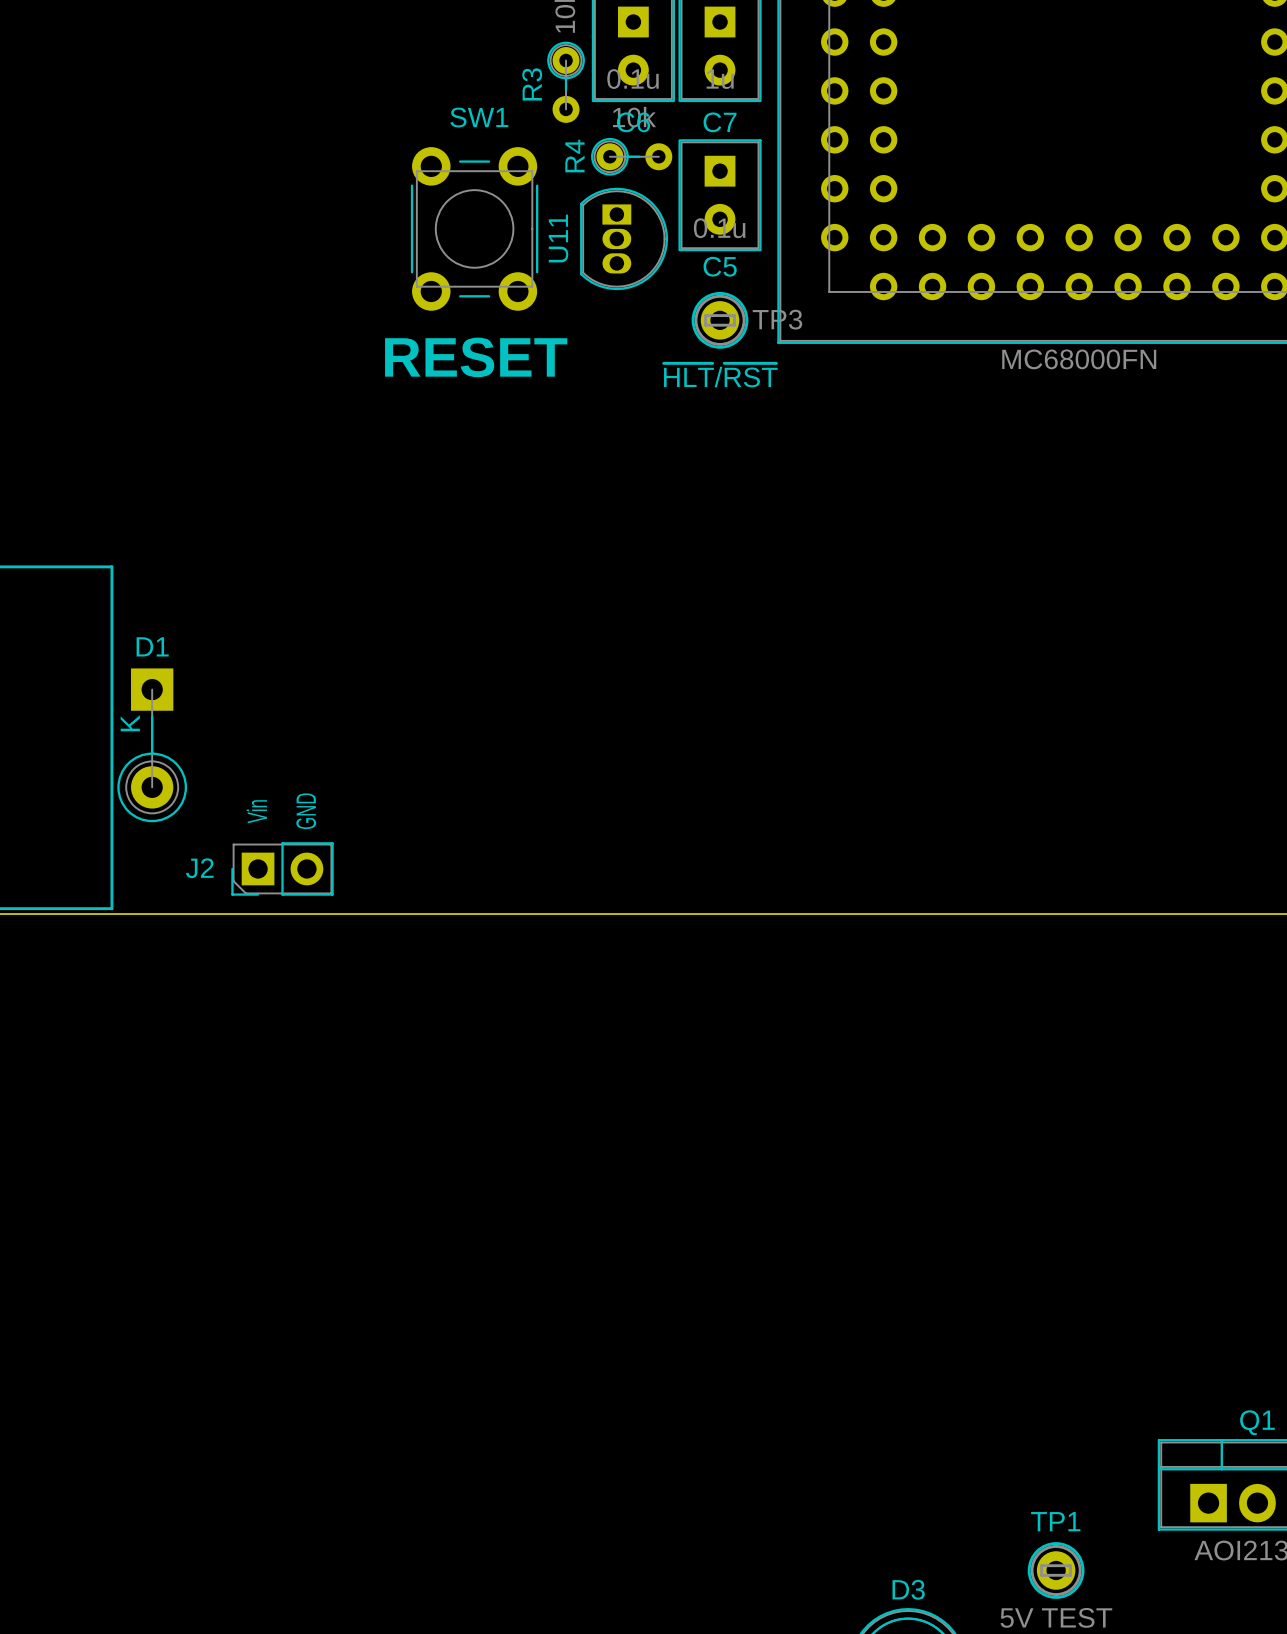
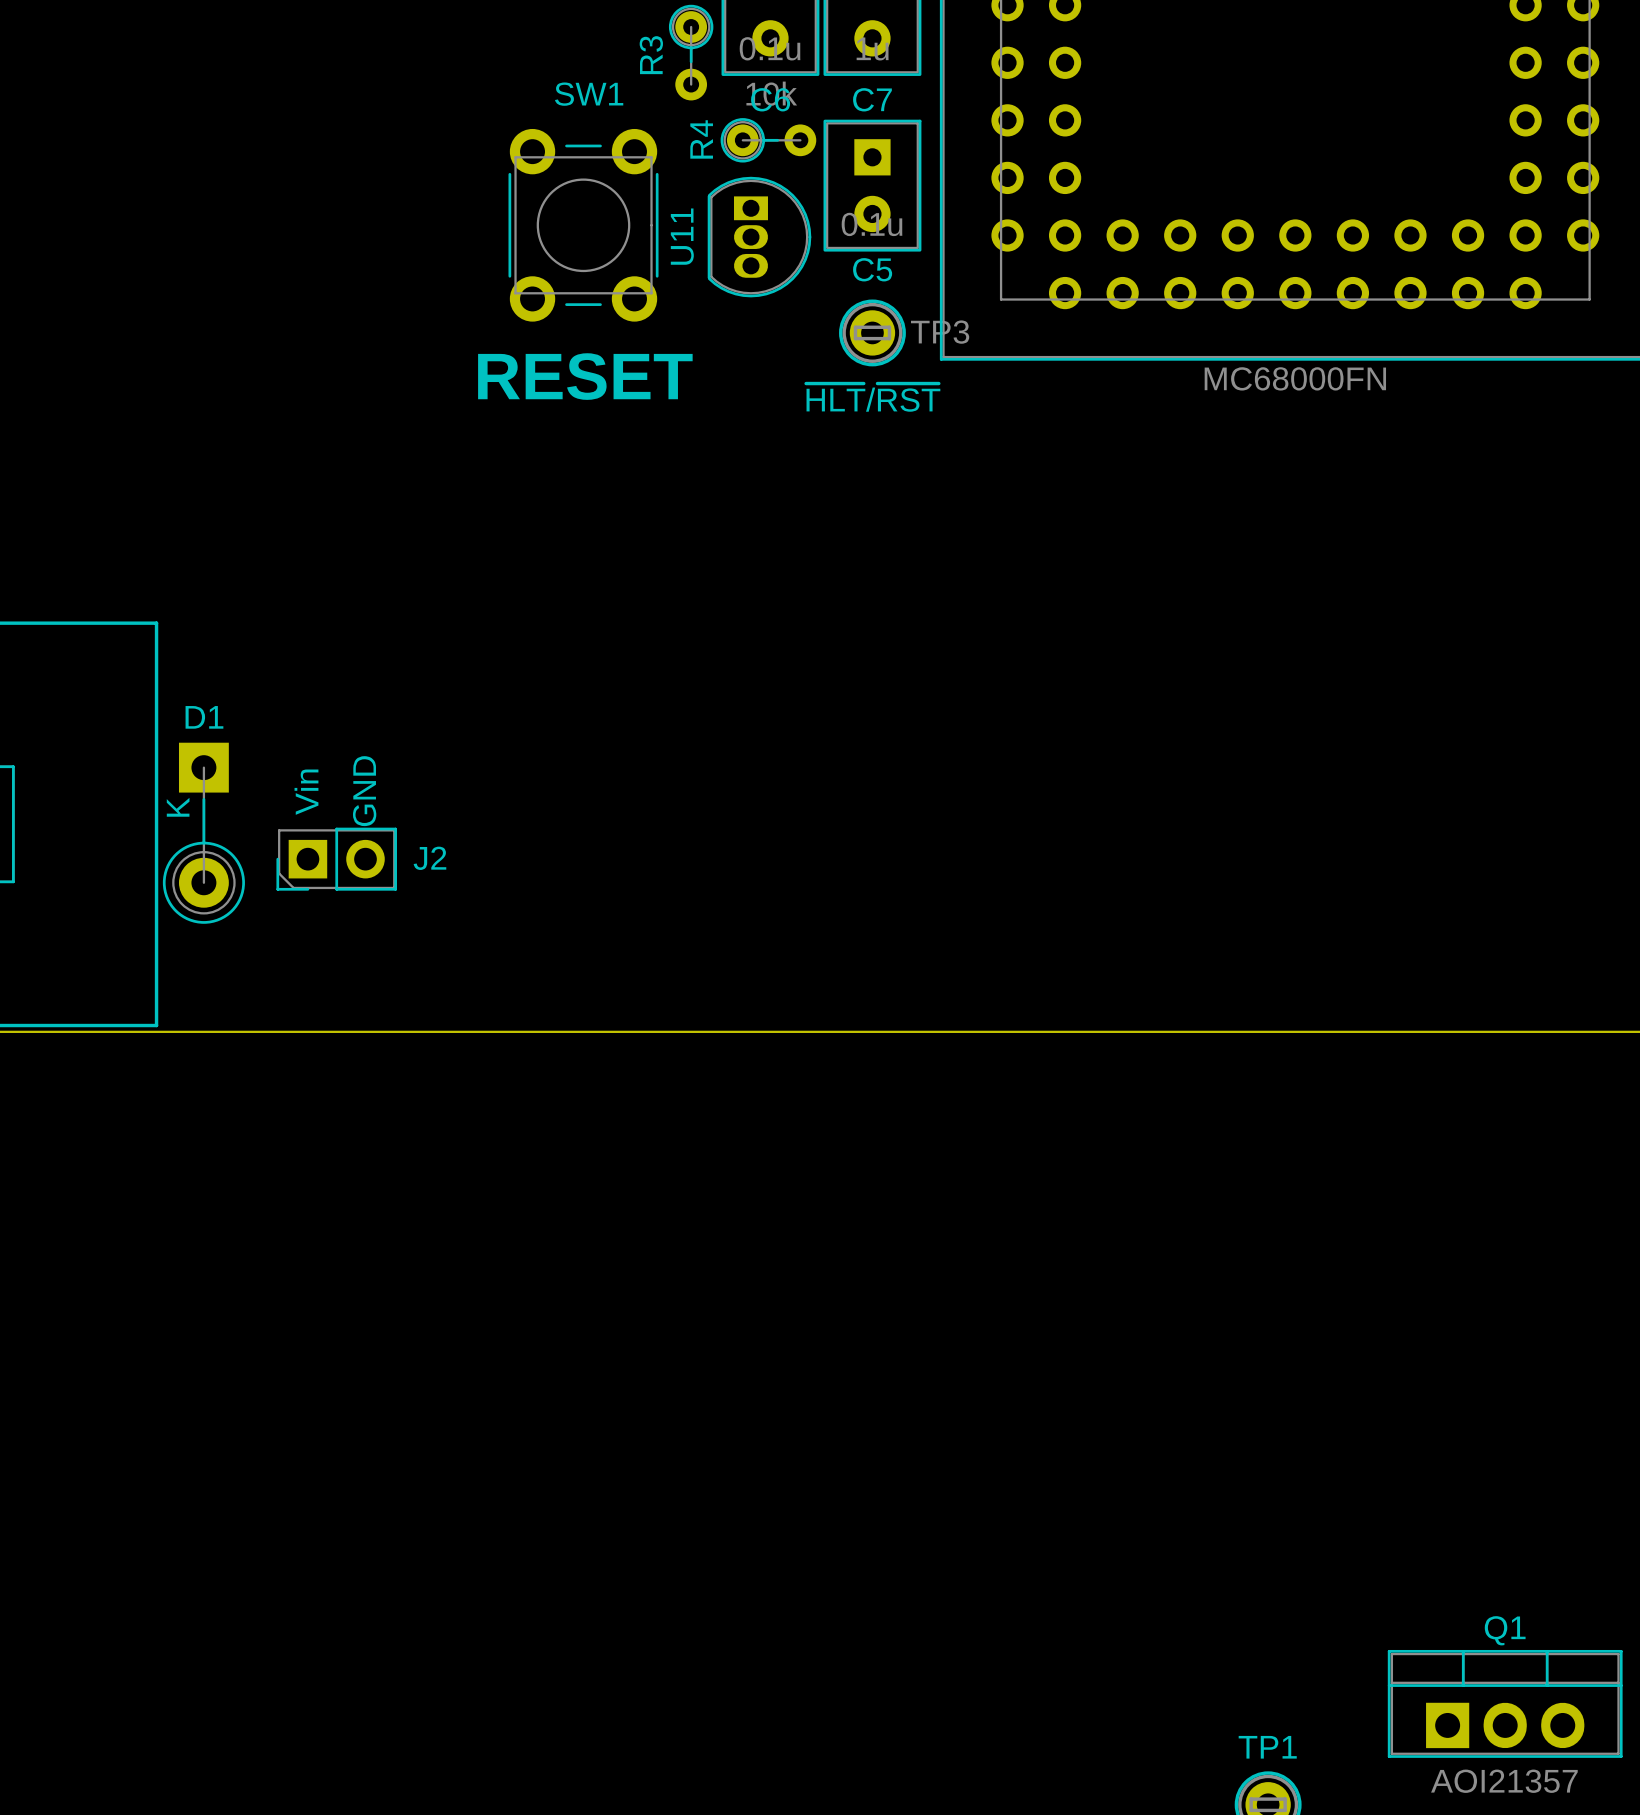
J2 name position: J2 (199, 868) -> J2 (429, 858)
J2 position: (282, 868) -> (336, 859)

